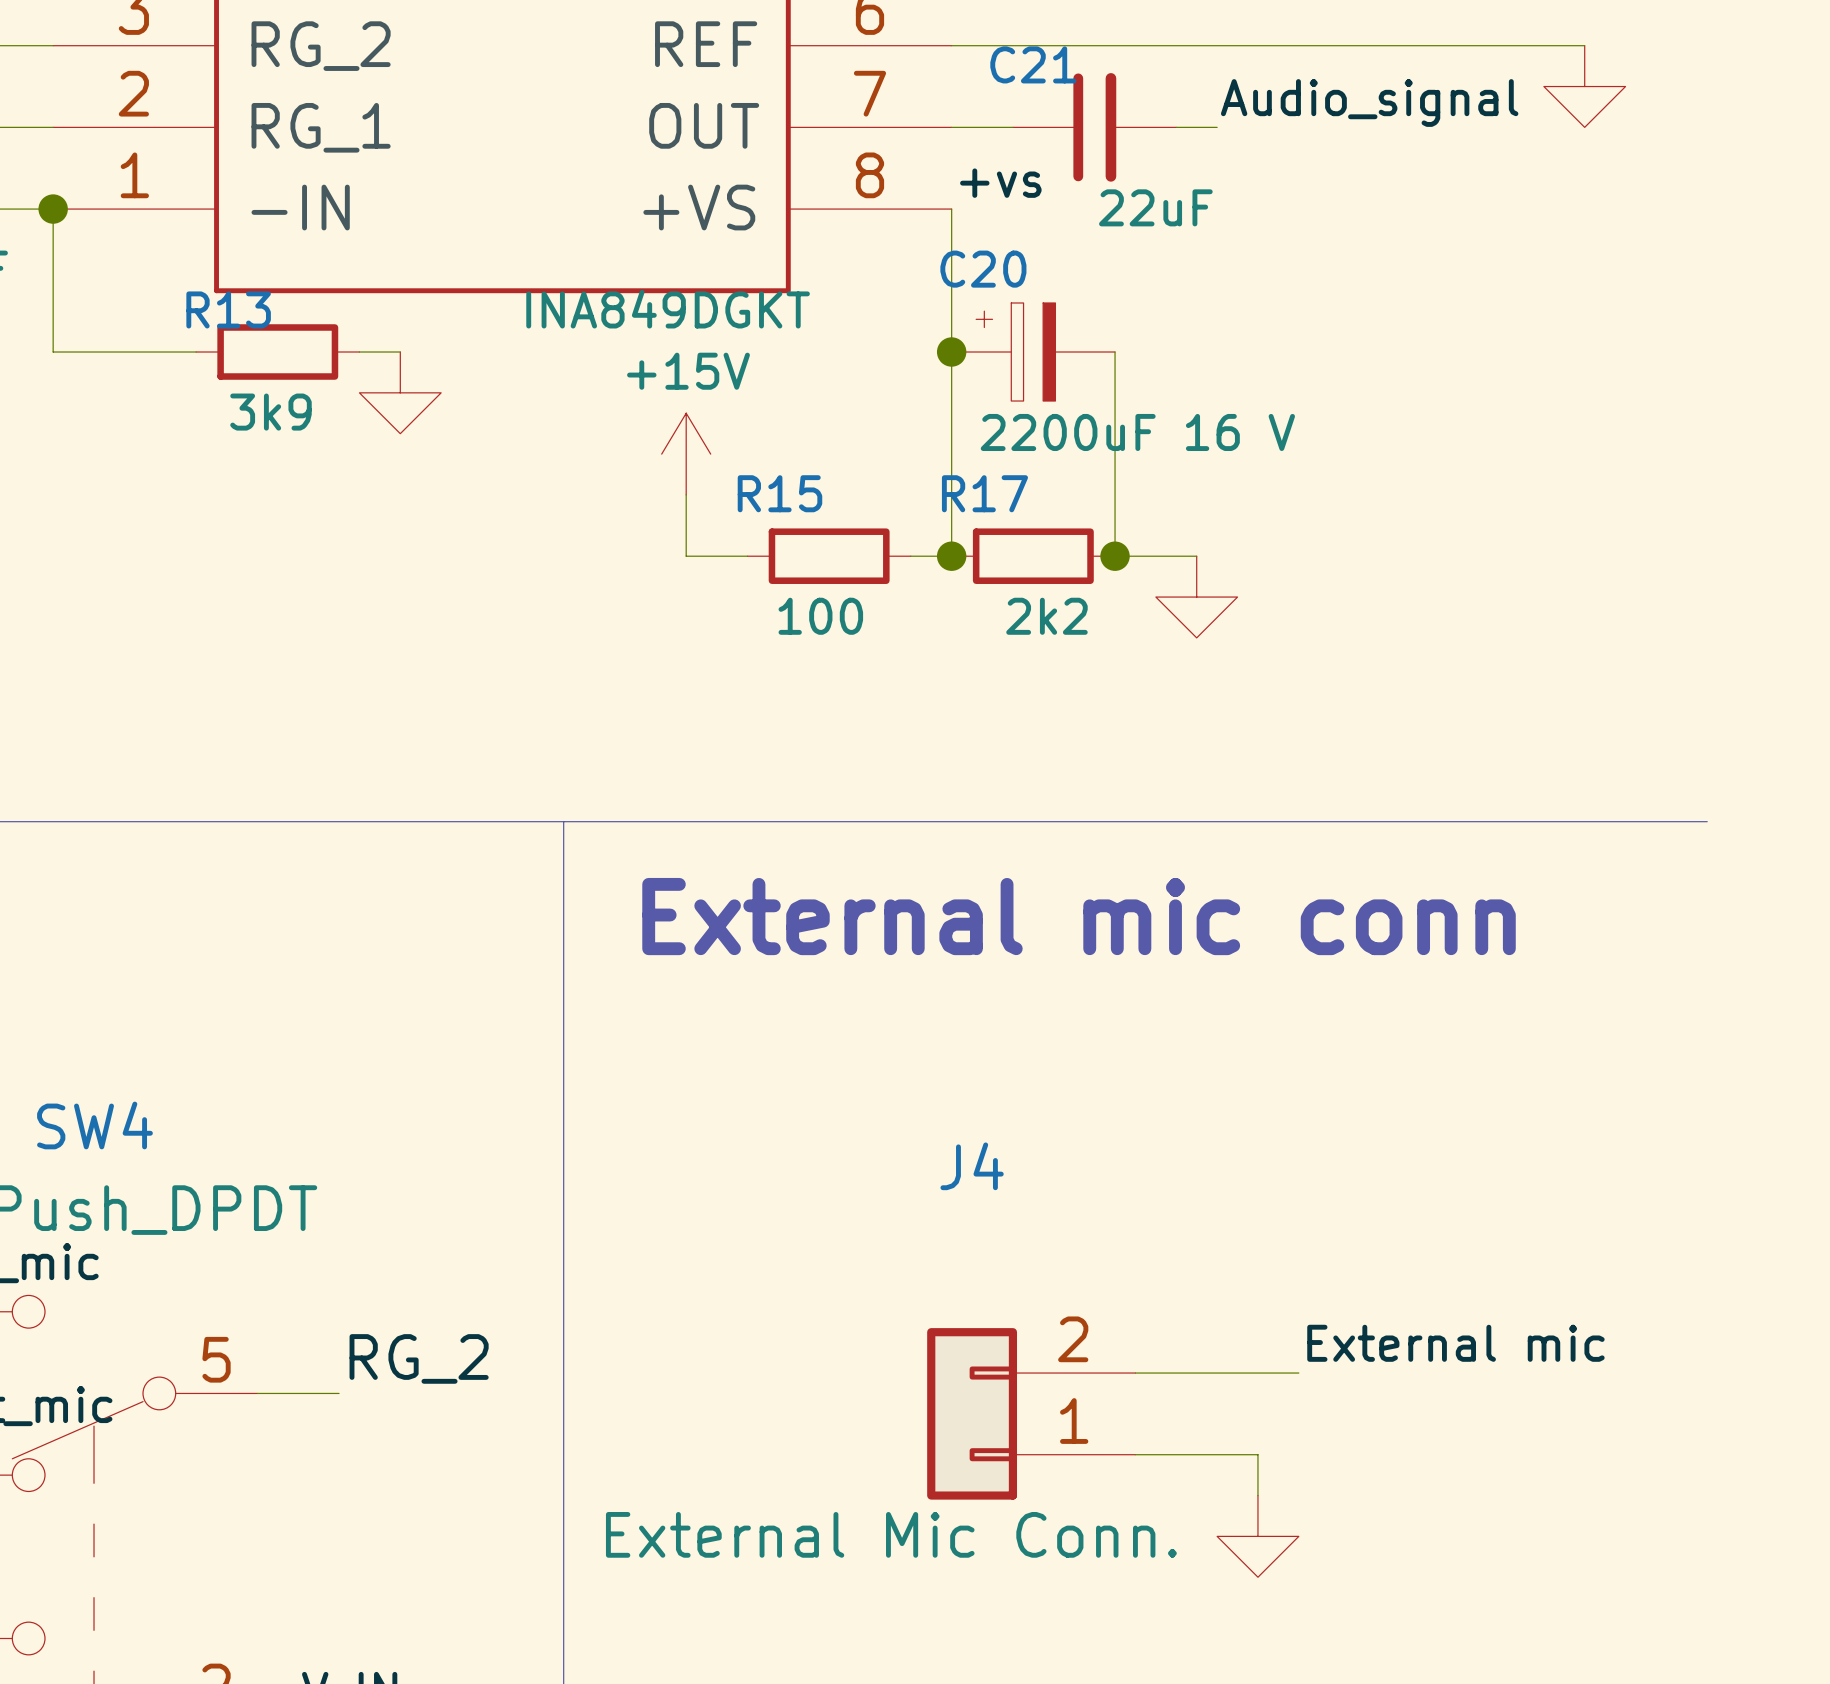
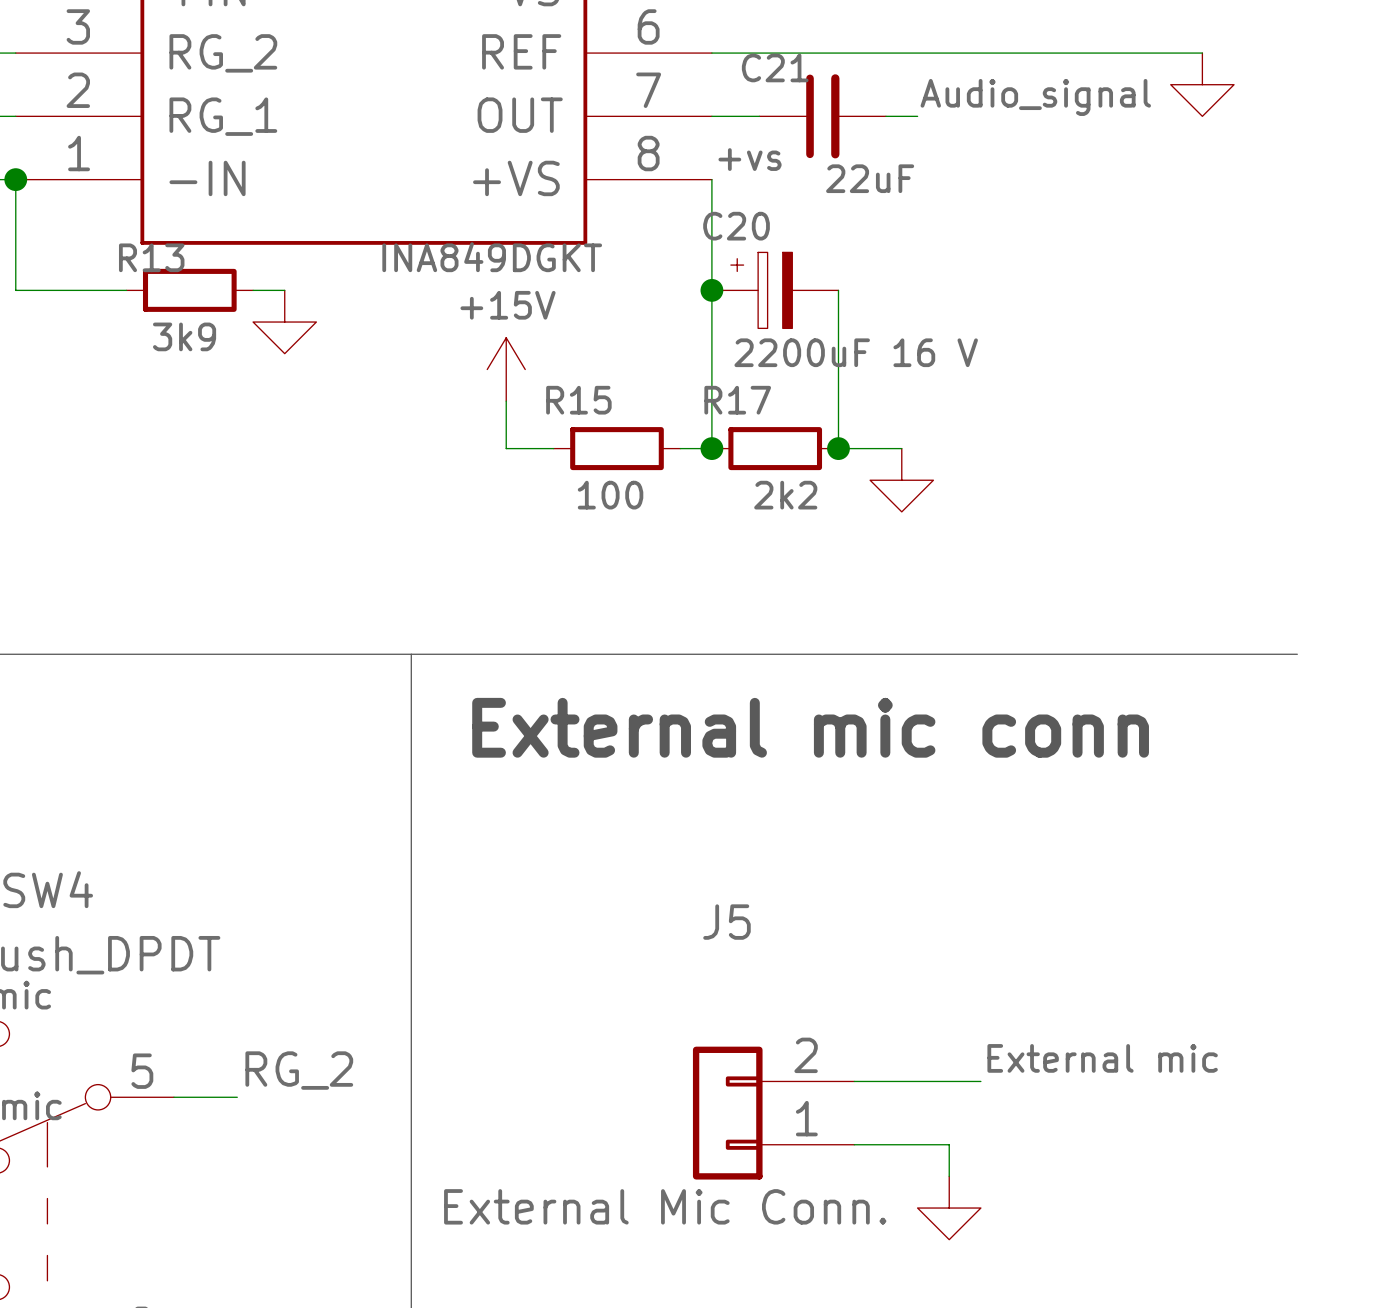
J4 name: J4 (972, 1166) -> J5 (726, 922)

